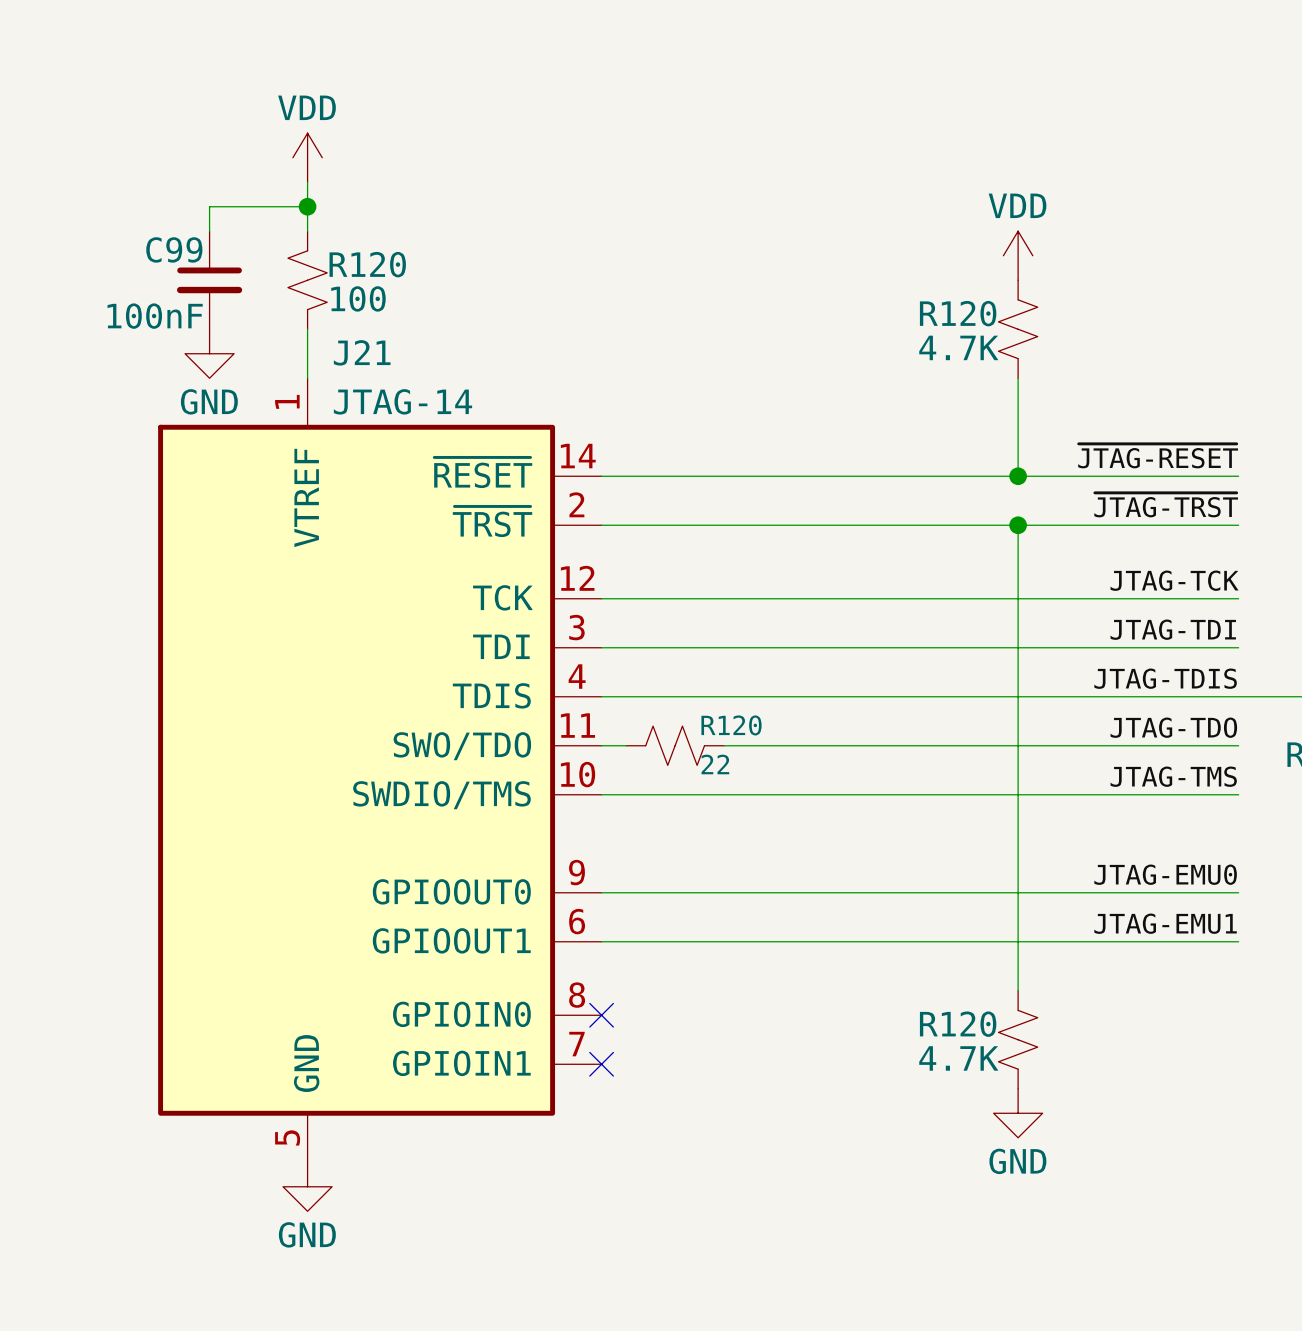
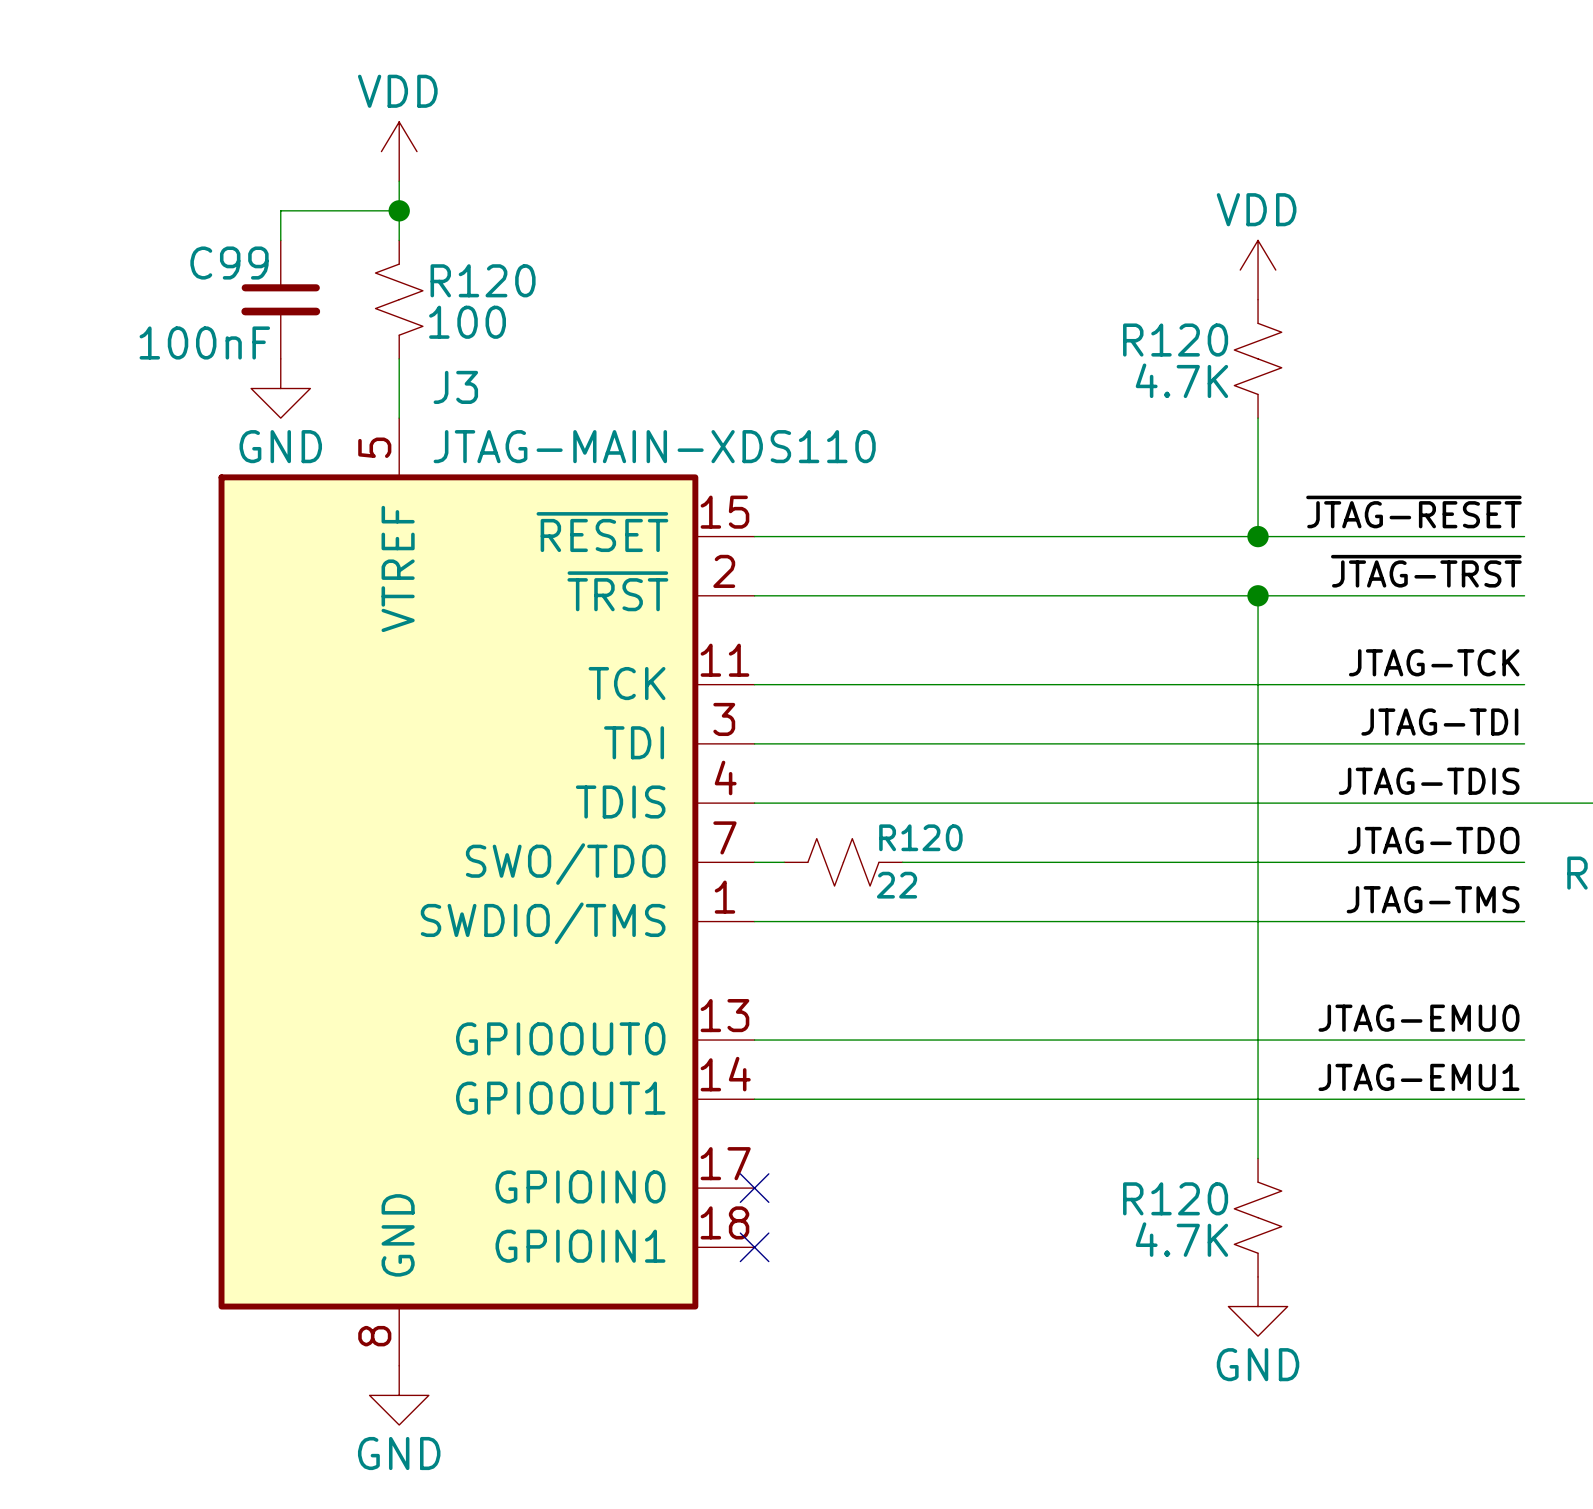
J21 name: J21 (362, 352) -> J3 (455, 387)
J21 symbol: [158, 378, 602, 1163] -> [218, 418, 755, 1366]
J21 value: JTAG-14 (402, 401) -> JTAG-MAIN-XDS110 (654, 446)

